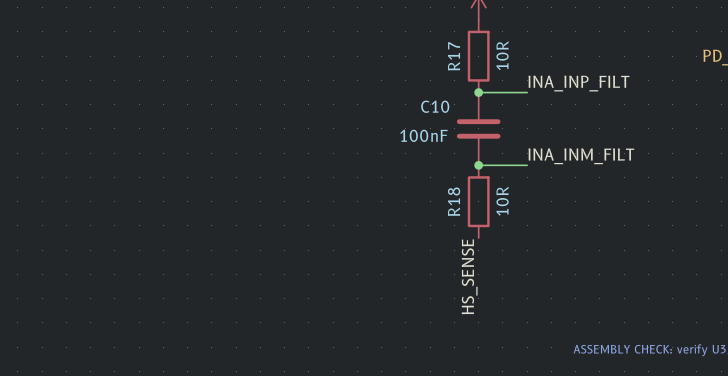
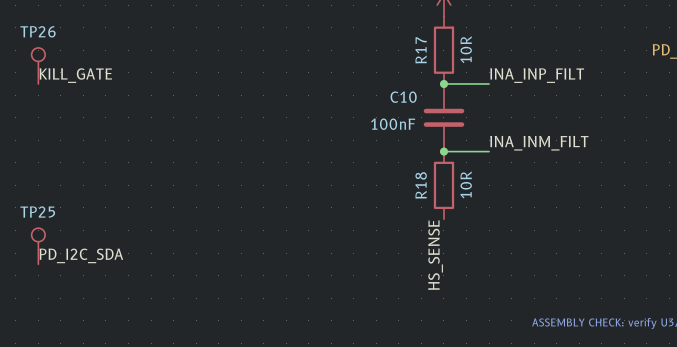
TP26: none -> (38, 65)
label: none -> KILL_GATE (75, 75)
TP25: none -> (38, 246)
label: none -> PD_I2C_SDA (81, 255)

